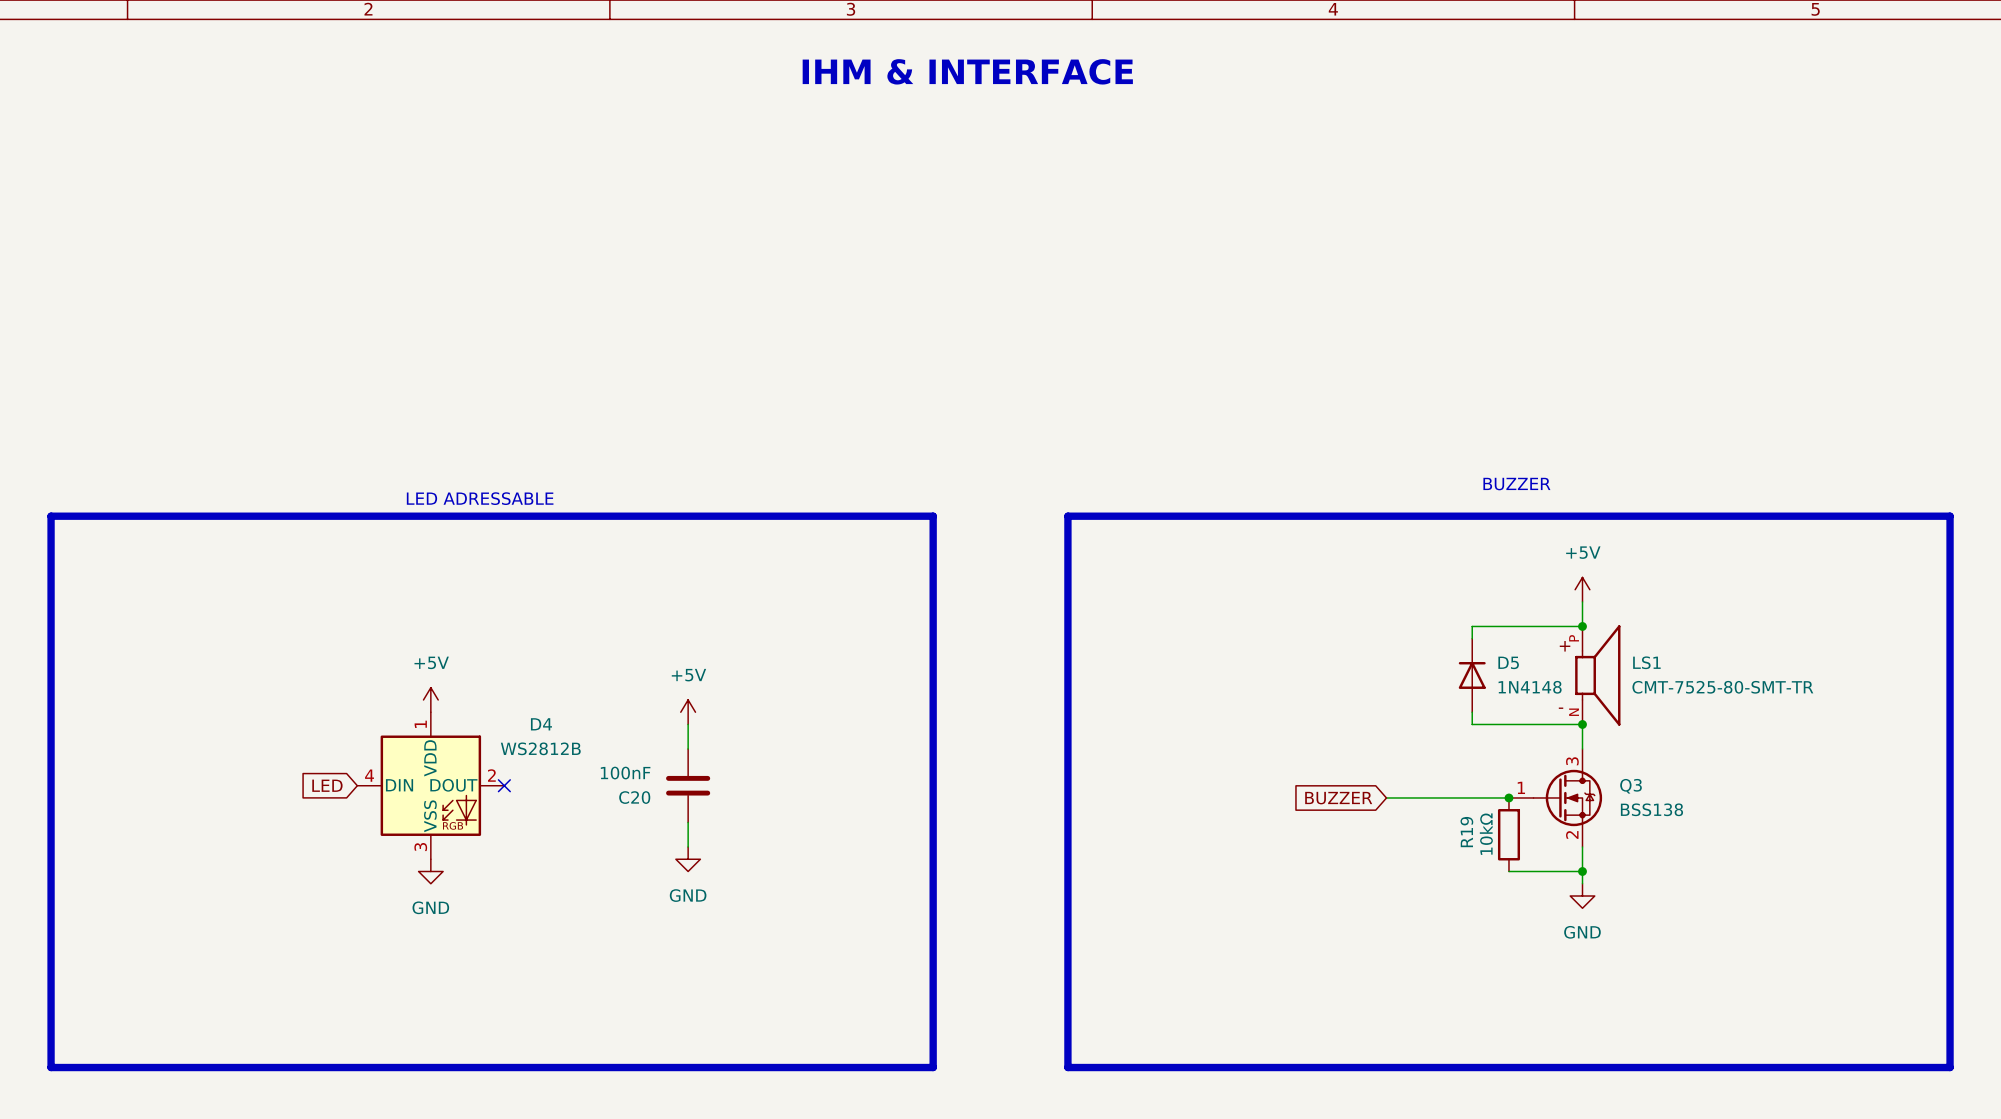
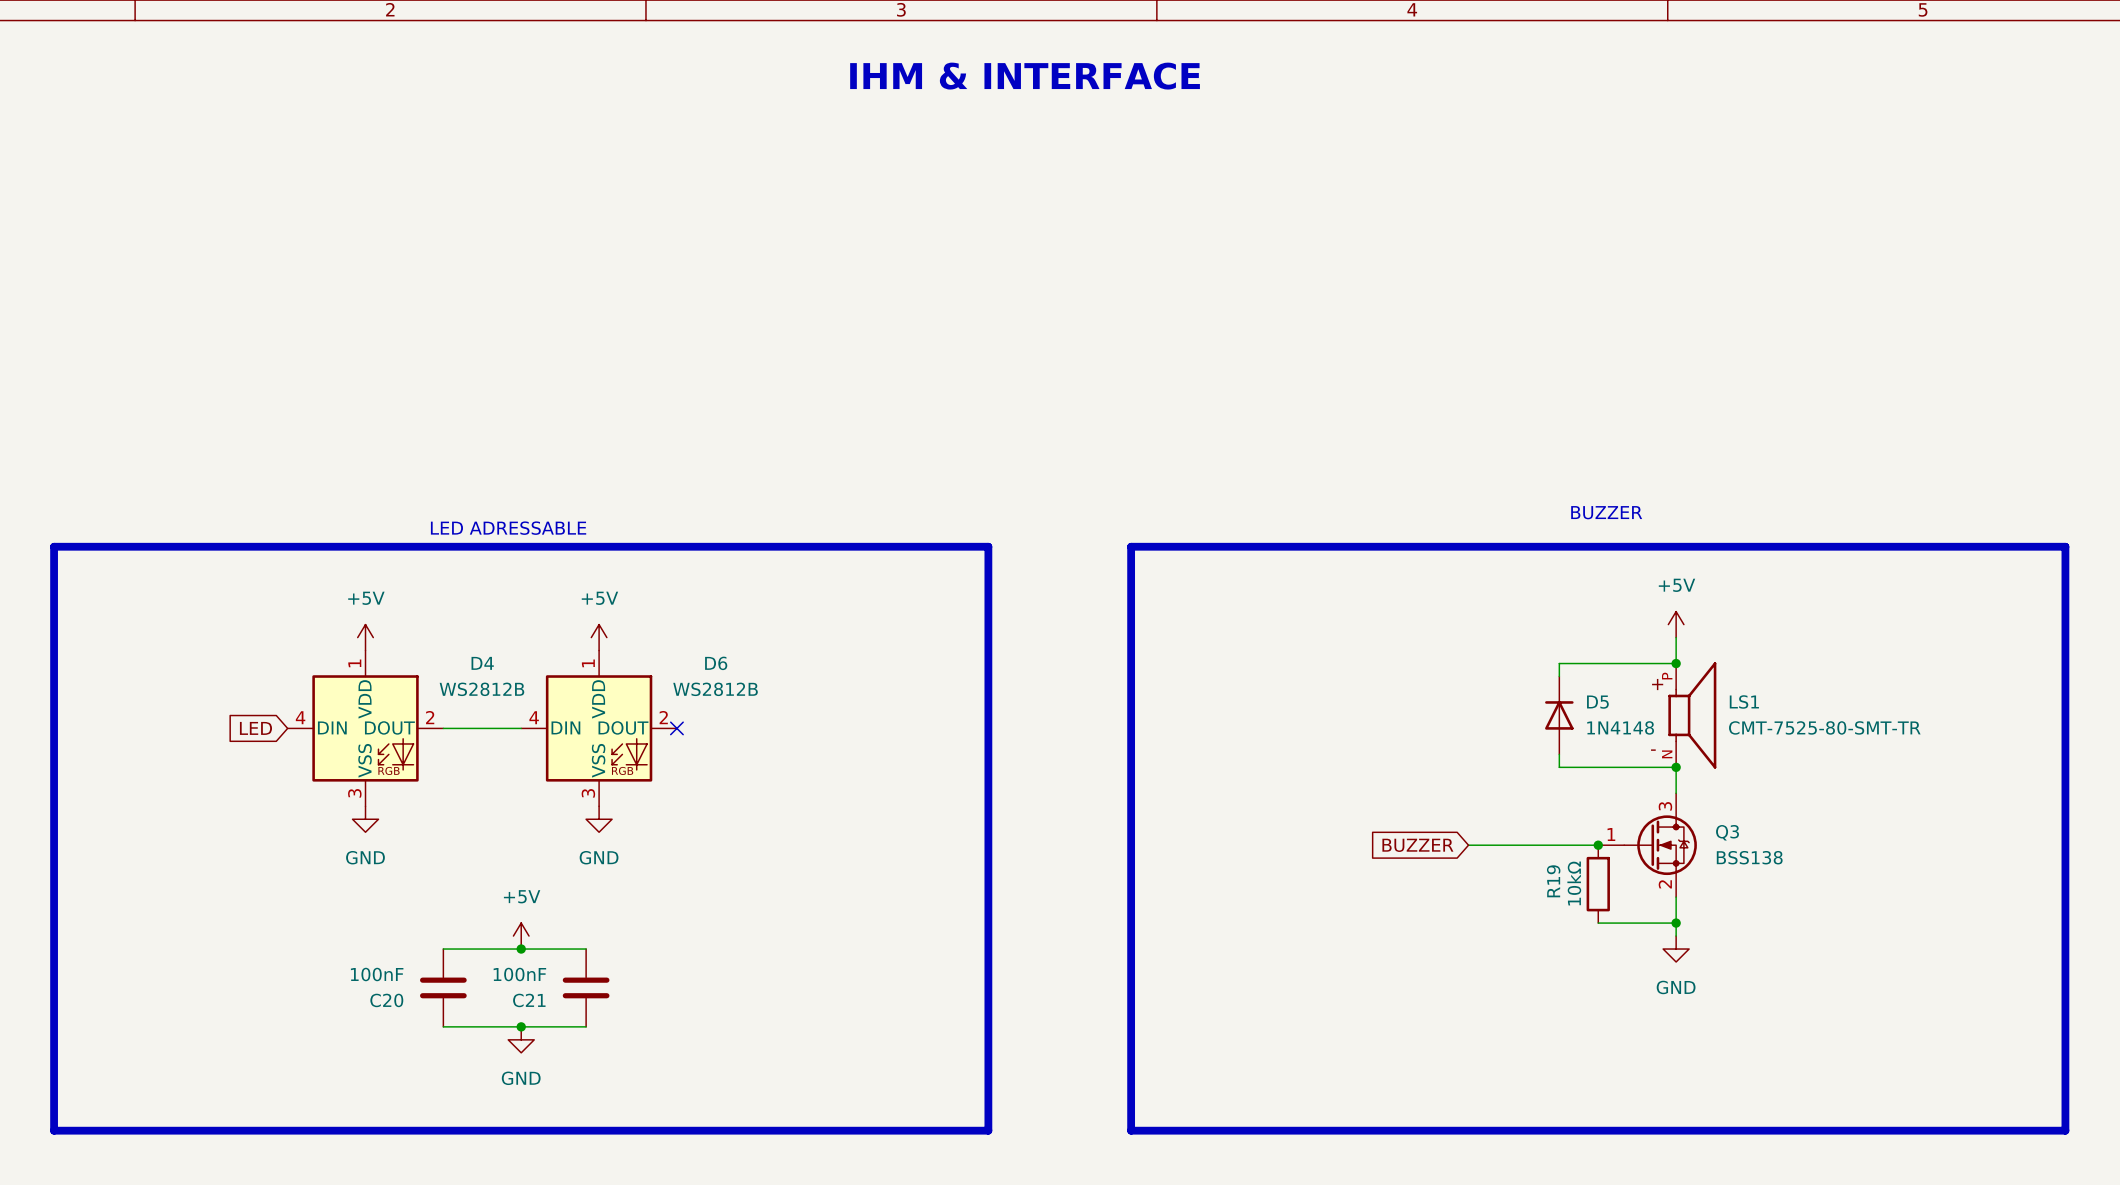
power symbol: none -> +5V (365, 637)
power symbol: none -> +5V (599, 637)
wire: none -> (443, 728) (521, 728)
D6: none -> WS2812B (599, 728)
no-connect mark: none -> (676, 728)
power symbol: +5V (430, 699) -> none
power symbol: +5V (688, 712) -> none
wire: (688, 724) (688, 748) -> none
power symbol: none -> GND (365, 819)
power symbol: none -> GND (599, 819)
global label position: LED (327, 785) -> LED (255, 728)
D4 position: (430, 785) -> (365, 728)
no-connect mark: (504, 785) -> none
C20 position: (688, 785) -> (443, 987)
wire: (688, 822) (688, 847) -> none
power symbol: GND (688, 859) -> none
power symbol: GND (430, 871) -> none
power symbol: none -> +5V (521, 936)
wire: none -> (443, 949) (586, 949)
junction: none -> (521, 949)
C21: none -> 100nF (586, 987)
wire: none -> (443, 1026) (586, 1026)
junction: none -> (521, 1026)
power symbol: none -> GND (521, 1039)

